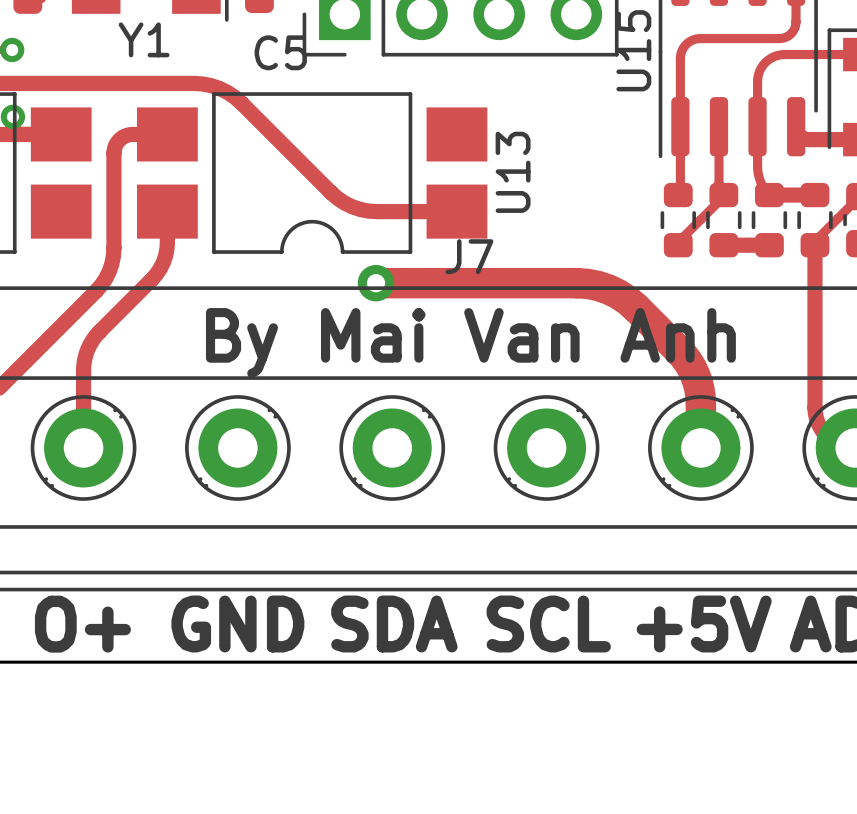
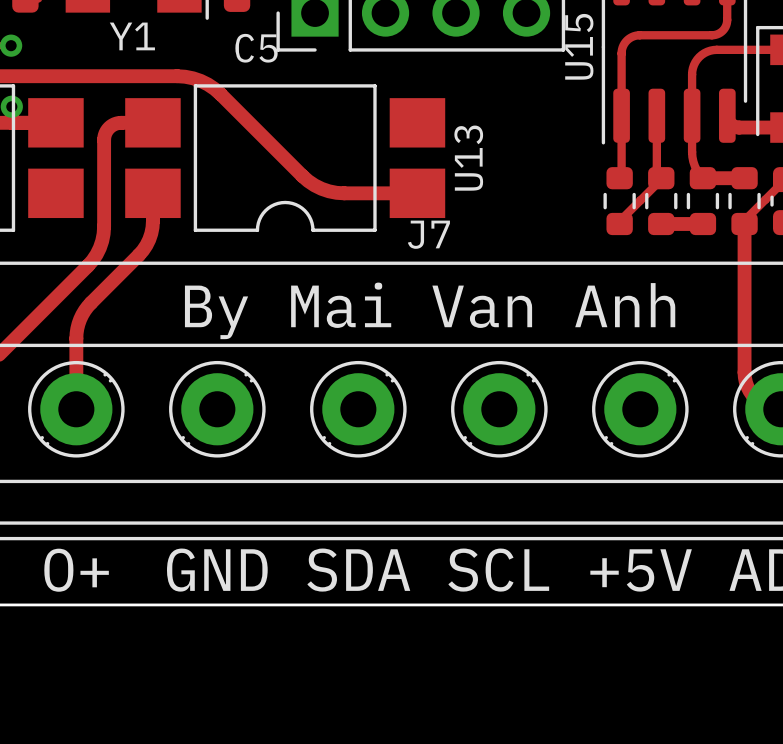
track: (375, 283) (576, 283) (598, 286) (618, 294) (636, 307) (678, 350) (691, 368) (700, 396) (700, 447) -> none
via: (375, 283) -> none

